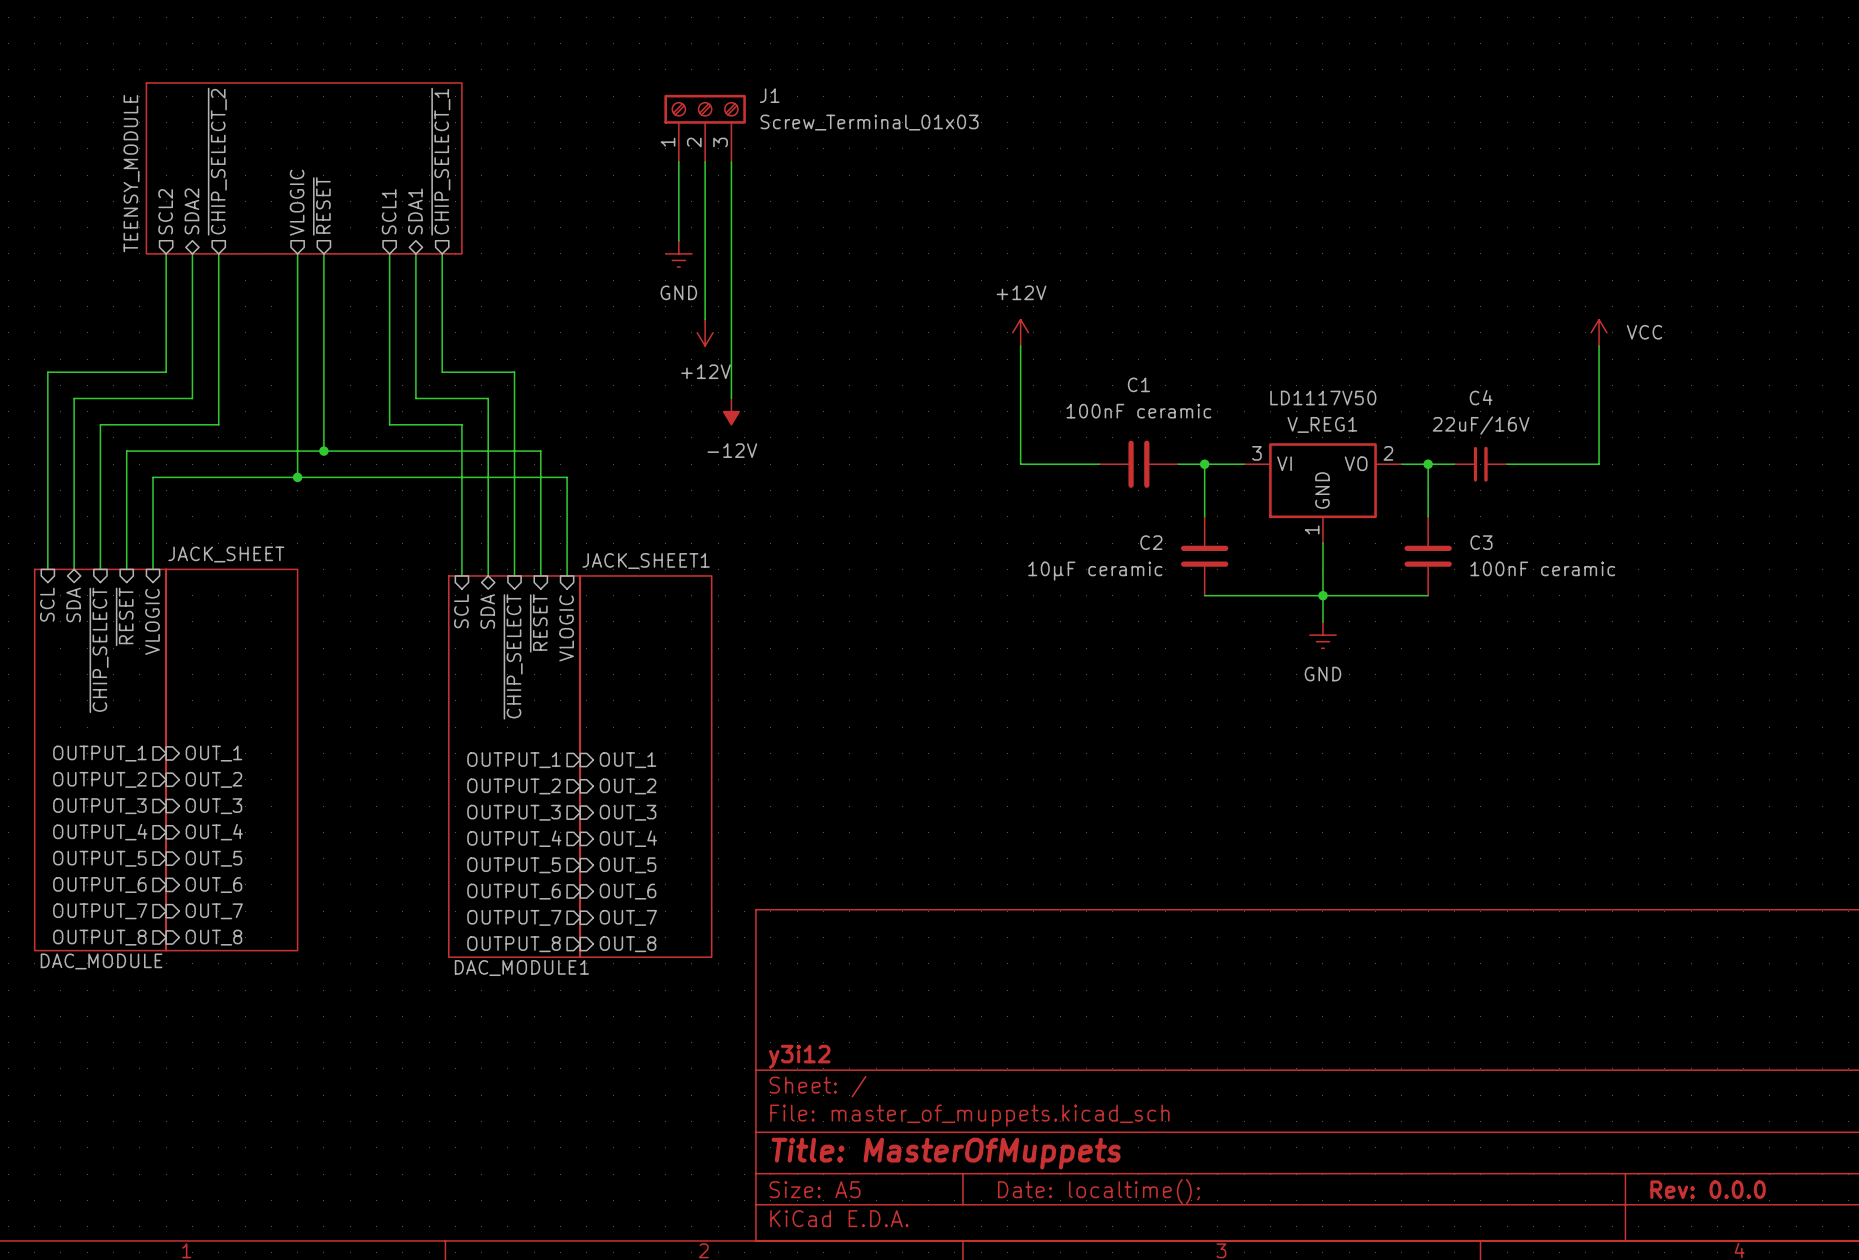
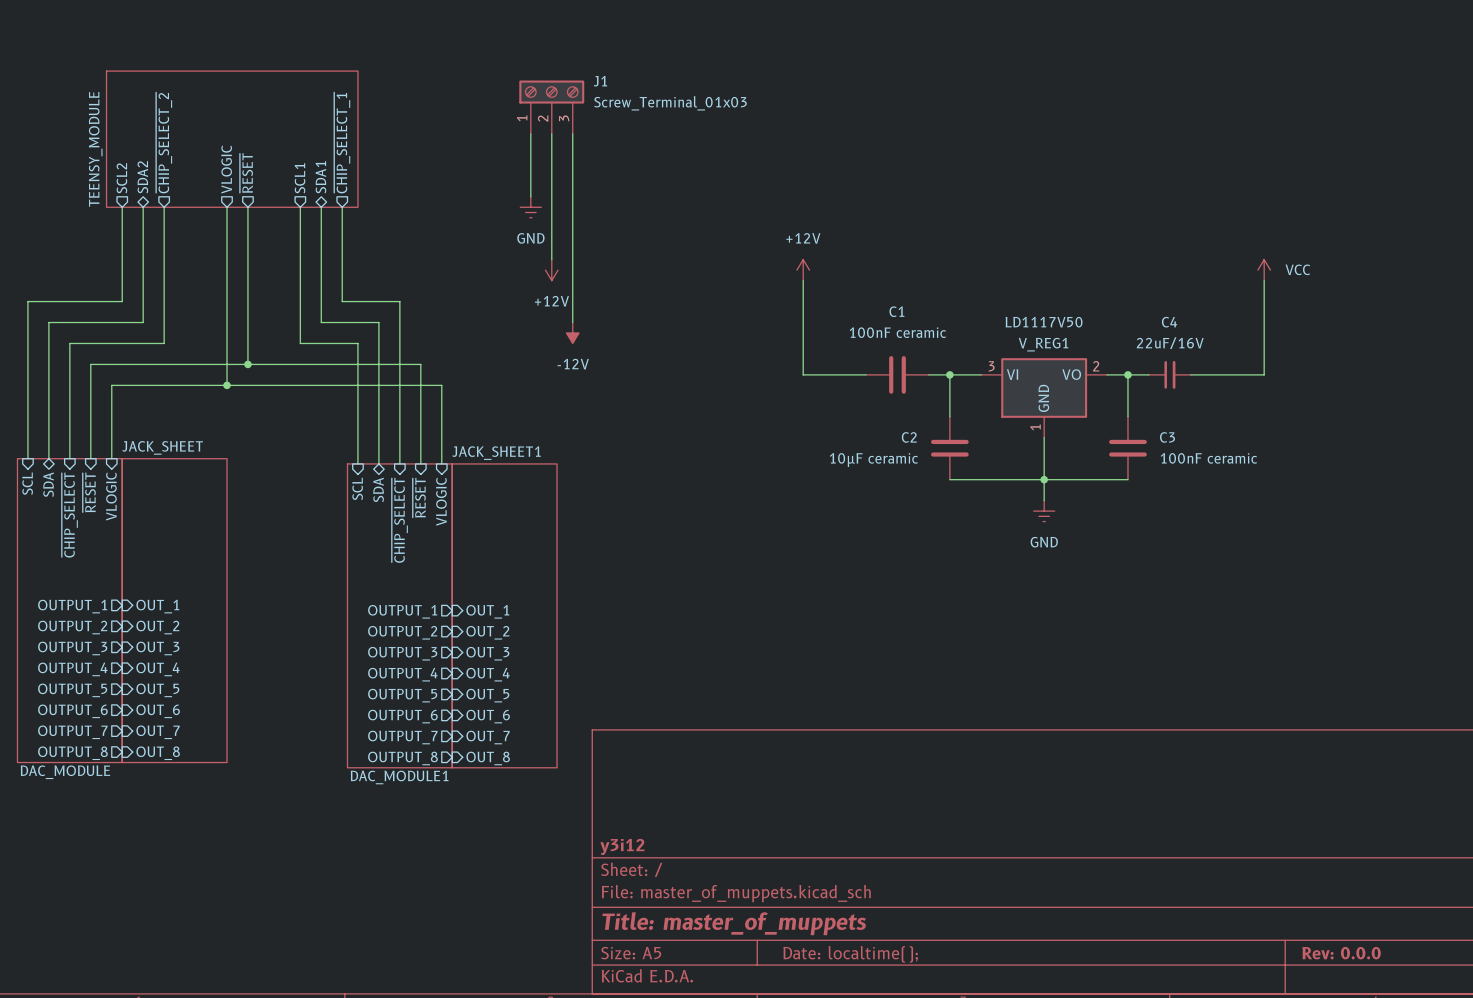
title block: Title: MasterOfMuppets (946, 1153) -> Title: master_of_muppets (734, 923)

